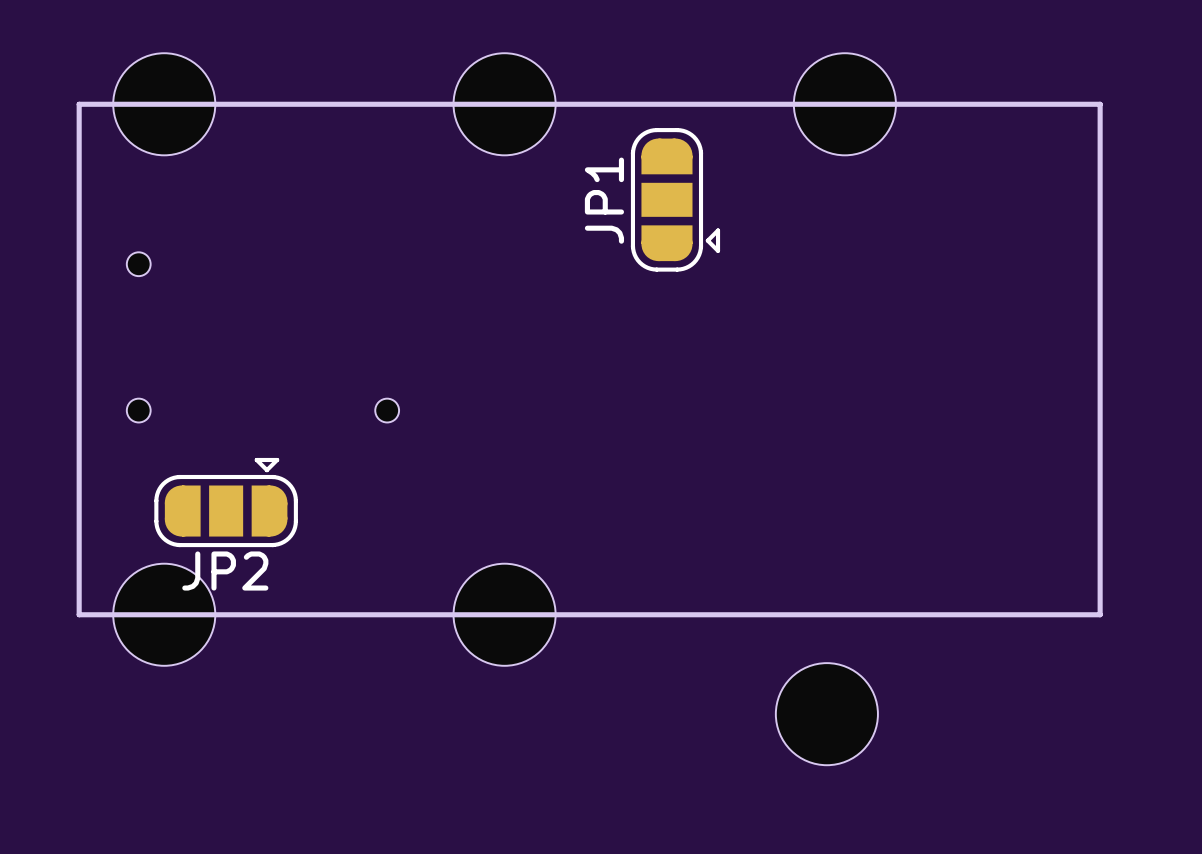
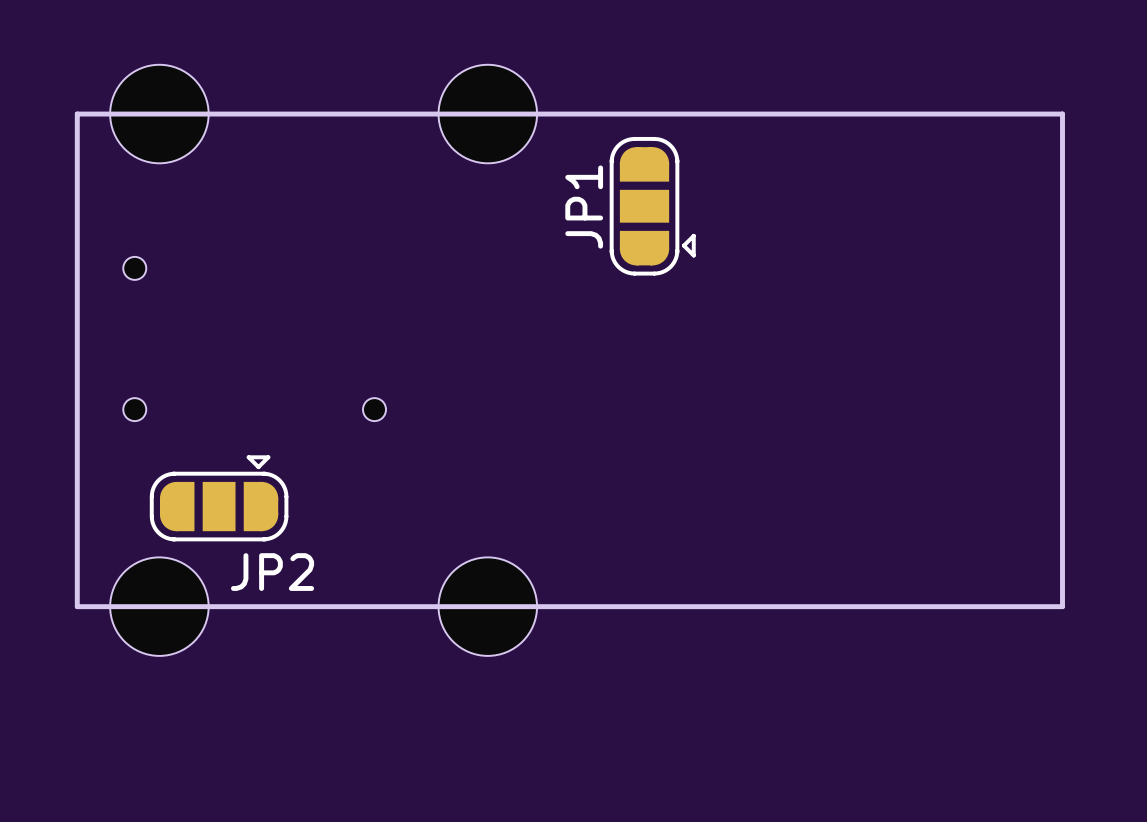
part: (844, 104) -> none
JP2 name position: JP2 (225, 571) -> JP2 (272, 572)
part: (826, 714) -> none

